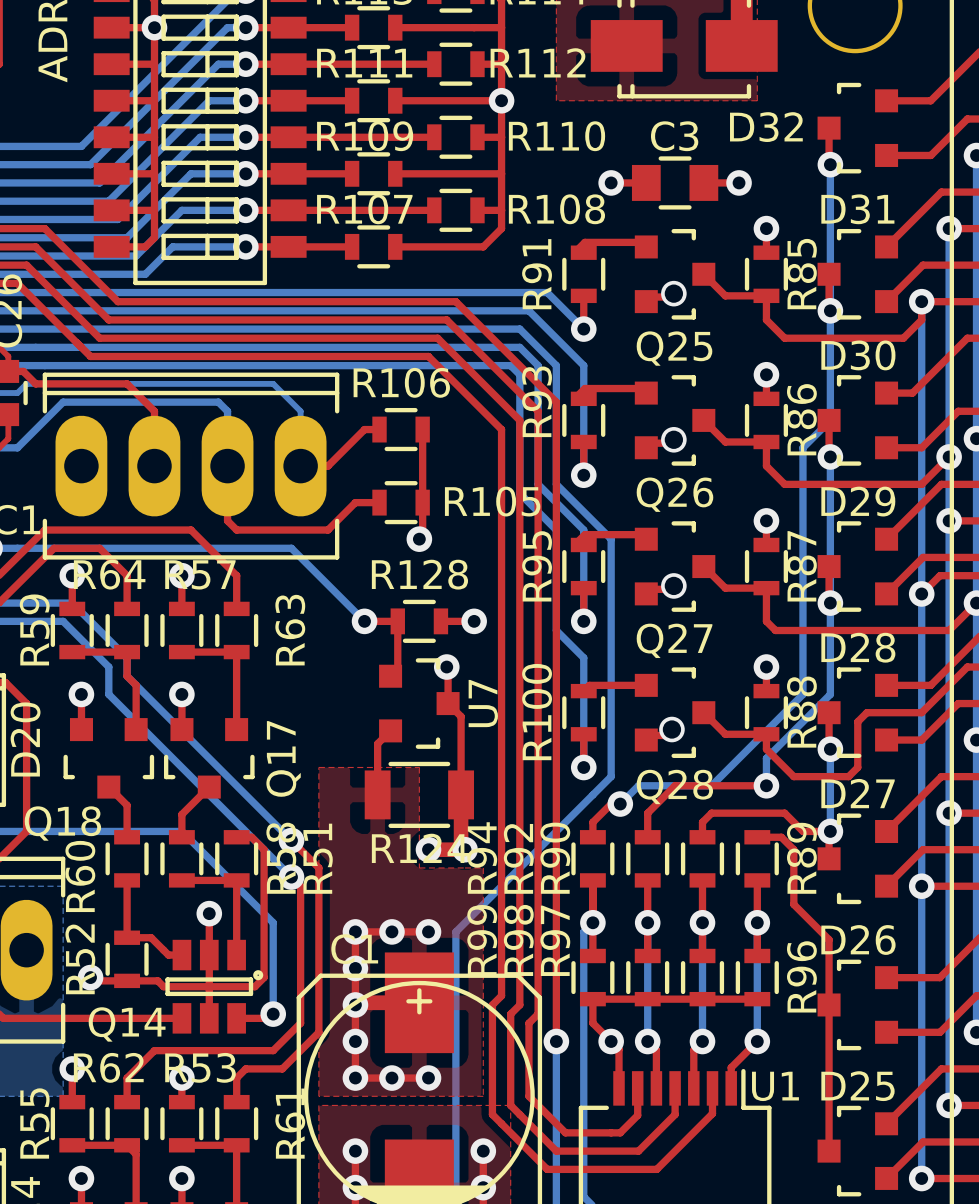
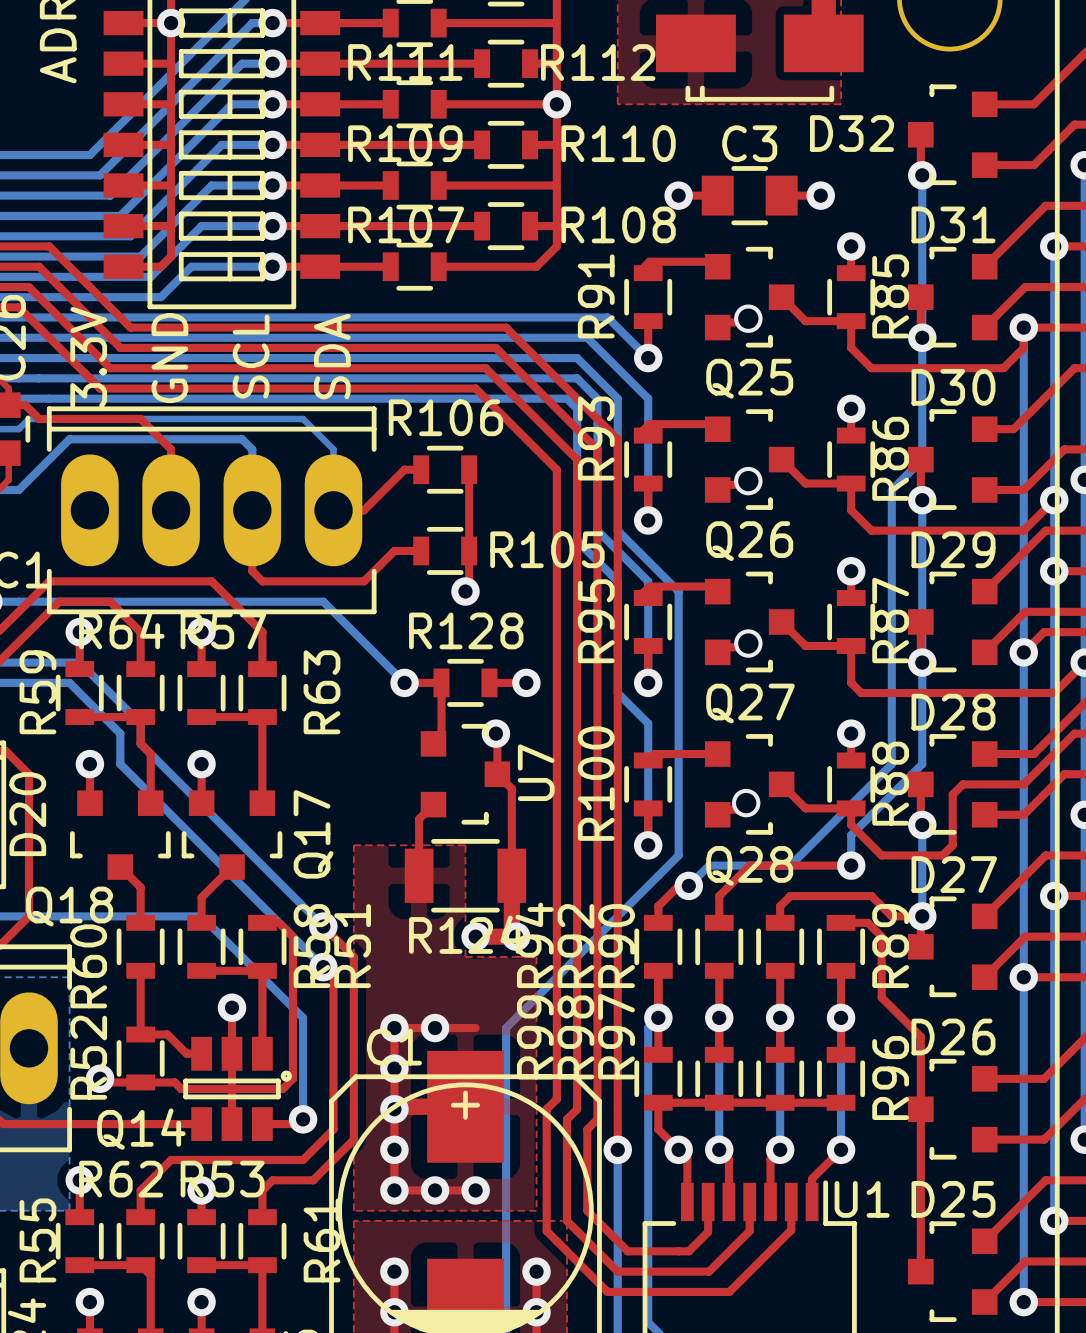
text: none -> 3.3V (88, 357)
text: none -> SCL (251, 356)
text: none -> SDA (332, 356)
text: none -> GND (169, 358)
via: (428, 931) -> none

